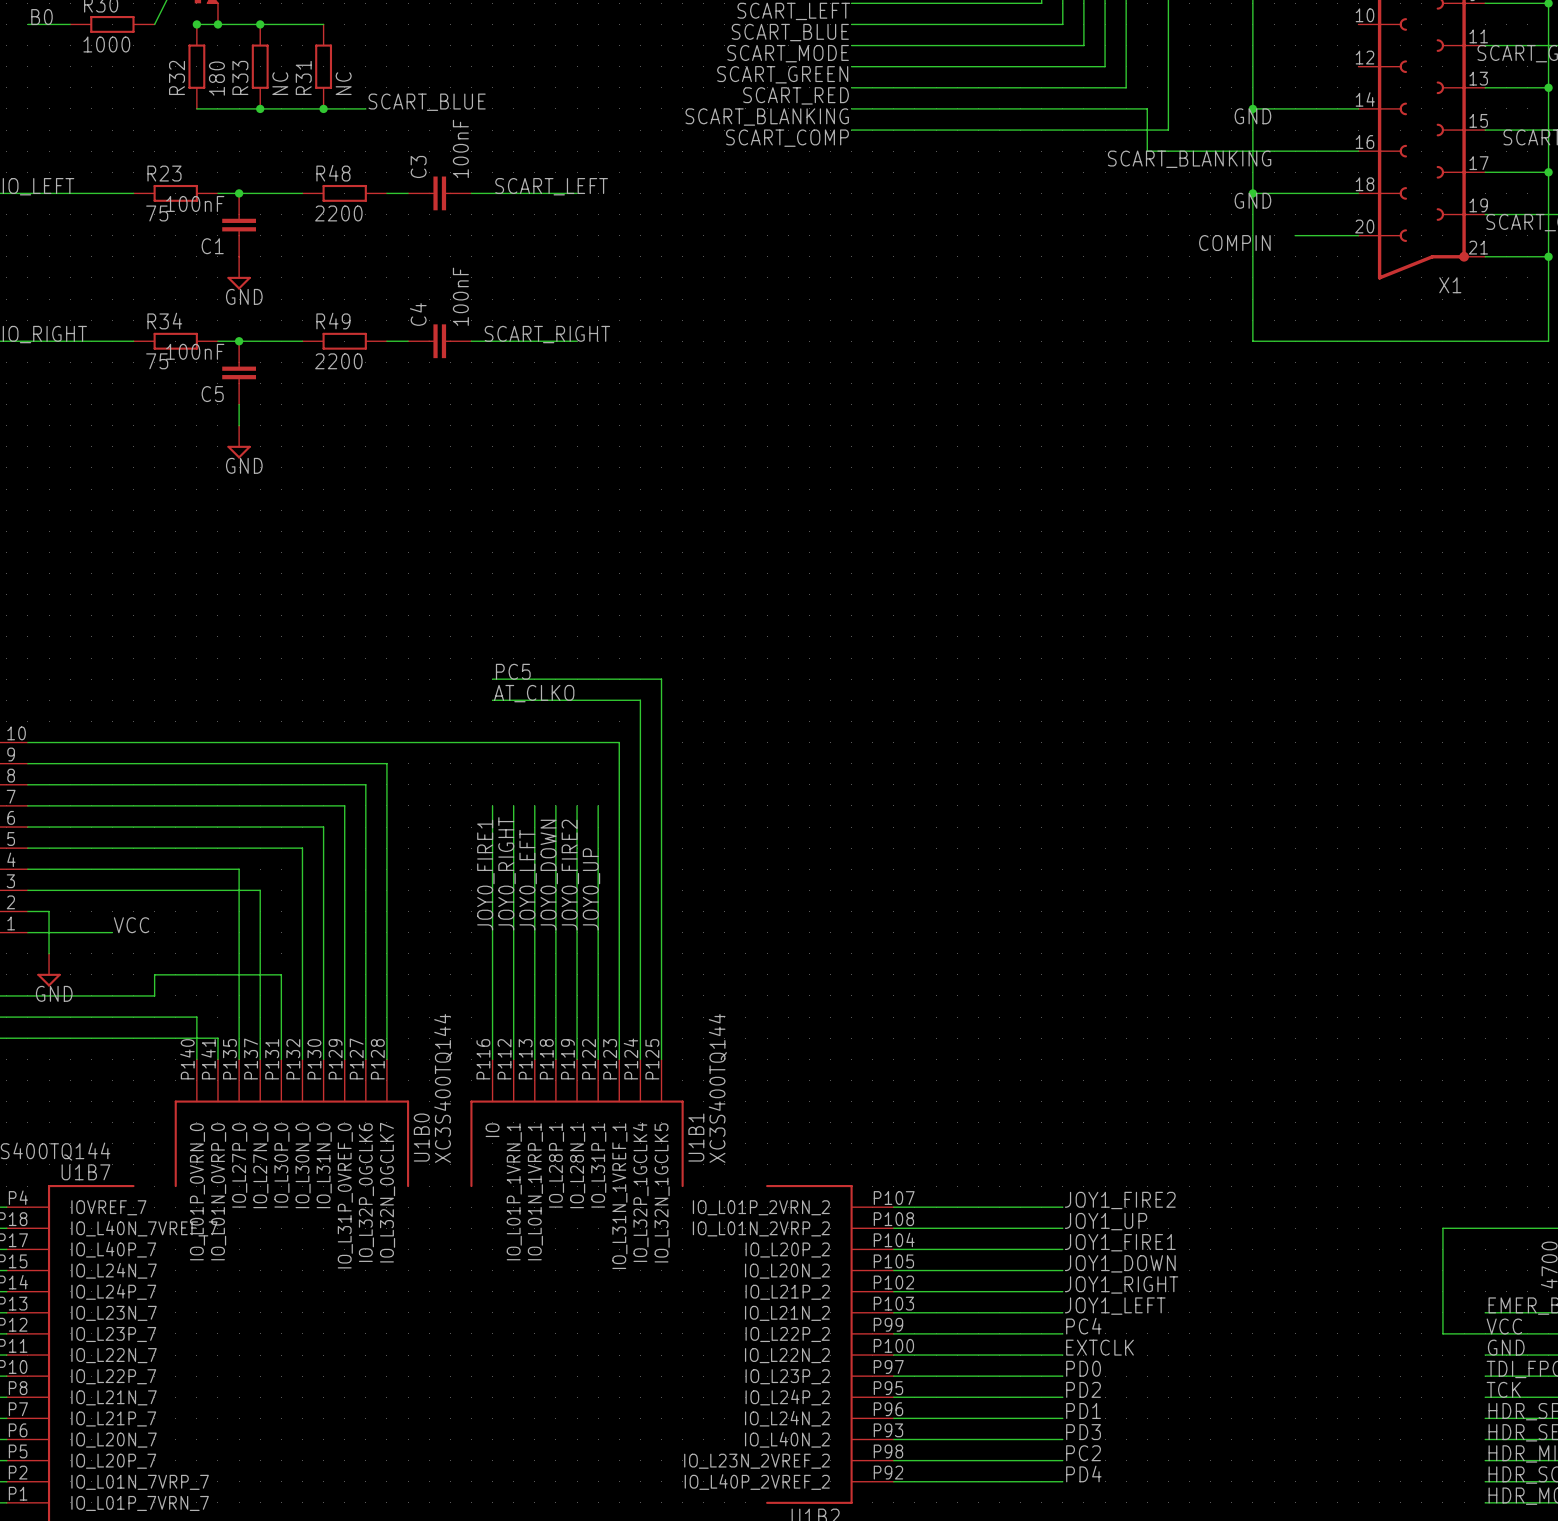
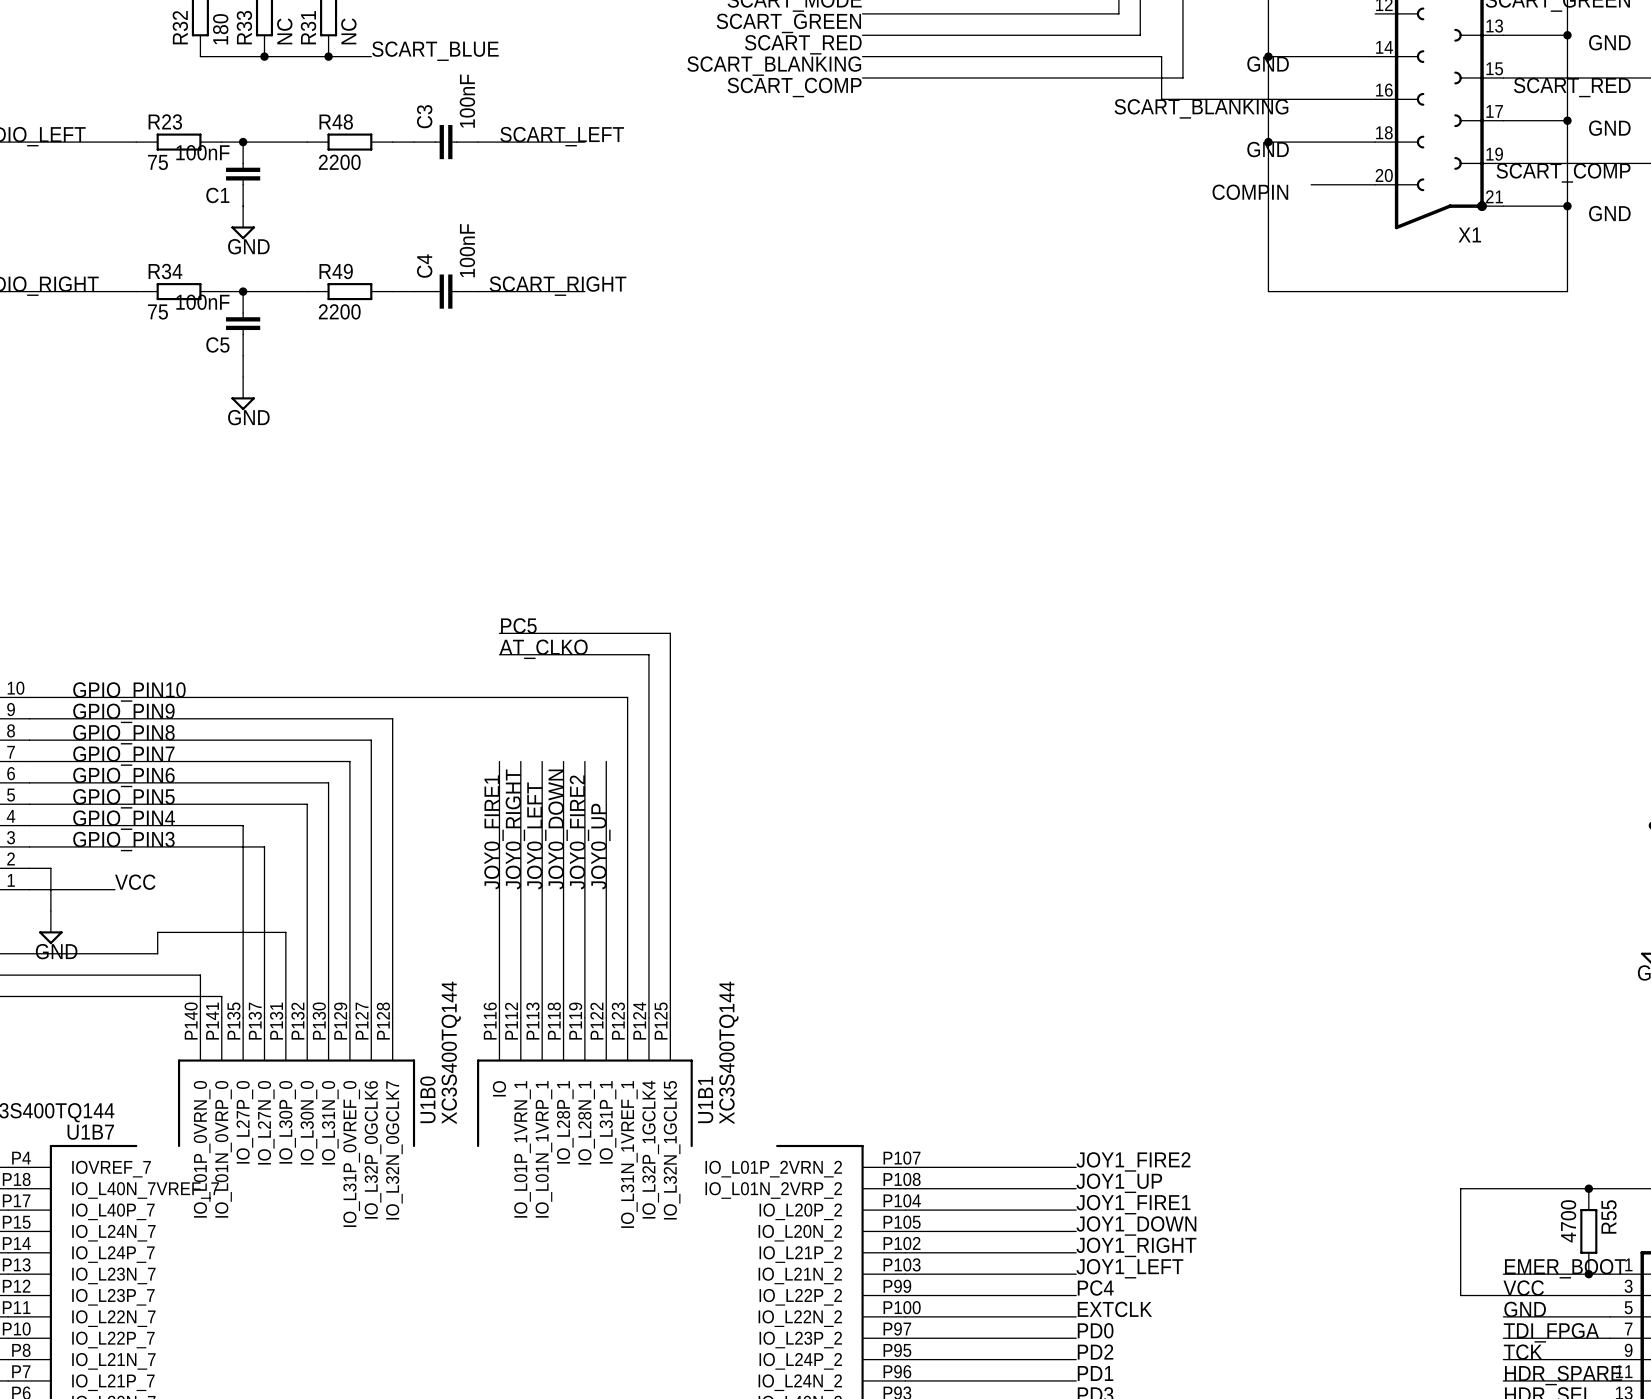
label: none -> GPIO_PIN10 (129, 692)
label: none -> GPIO_PIN9 (123, 713)
label: none -> GPIO_PIN8 (123, 734)
label: none -> GPIO_PIN7 (123, 756)
label: none -> GPIO_PIN6 (123, 777)
label: none -> GPIO_PIN5 (123, 798)
label: none -> GPIO_PIN4 (124, 820)
label: none -> GPIO_PIN3 (123, 841)

